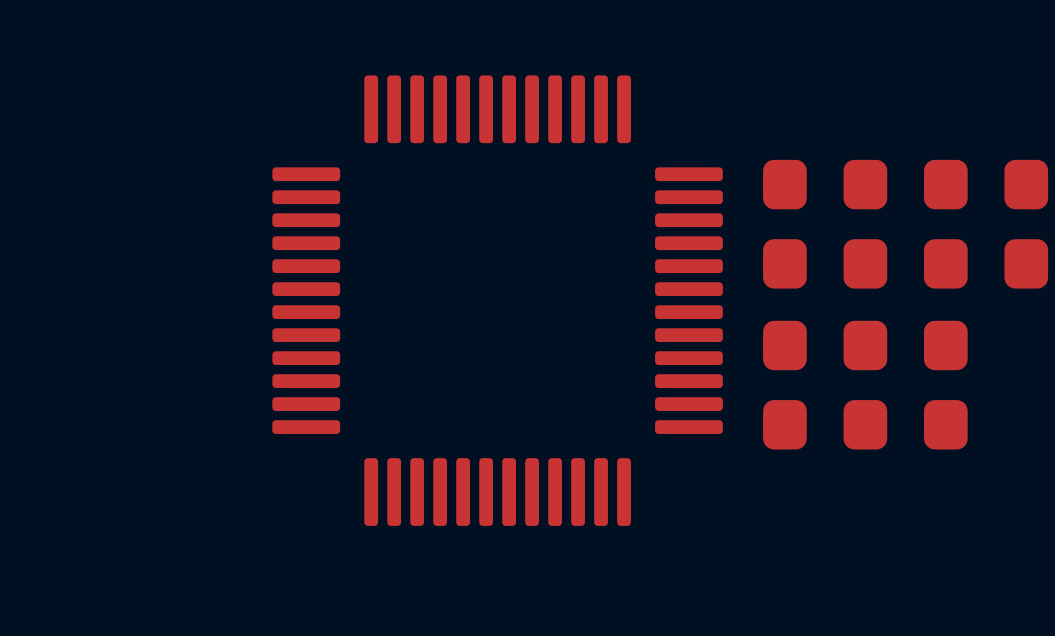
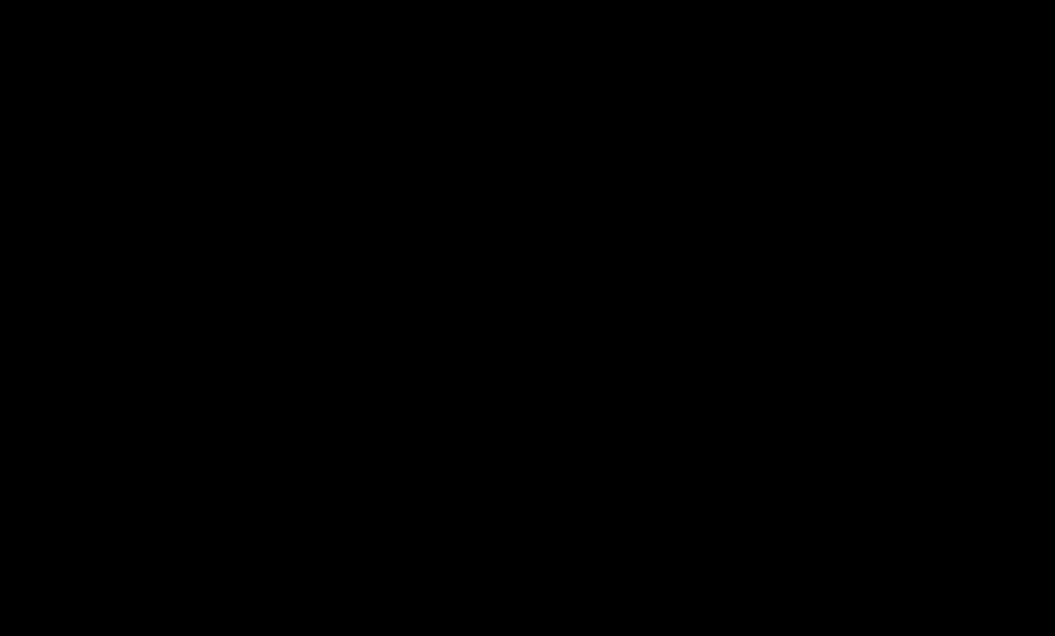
part: (784, 224) -> none
part: (865, 224) -> none
part: (945, 224) -> none
part: (1026, 224) -> none
part: (497, 300) -> none
part: (784, 385) -> none
part: (865, 385) -> none
part: (945, 385) -> none

